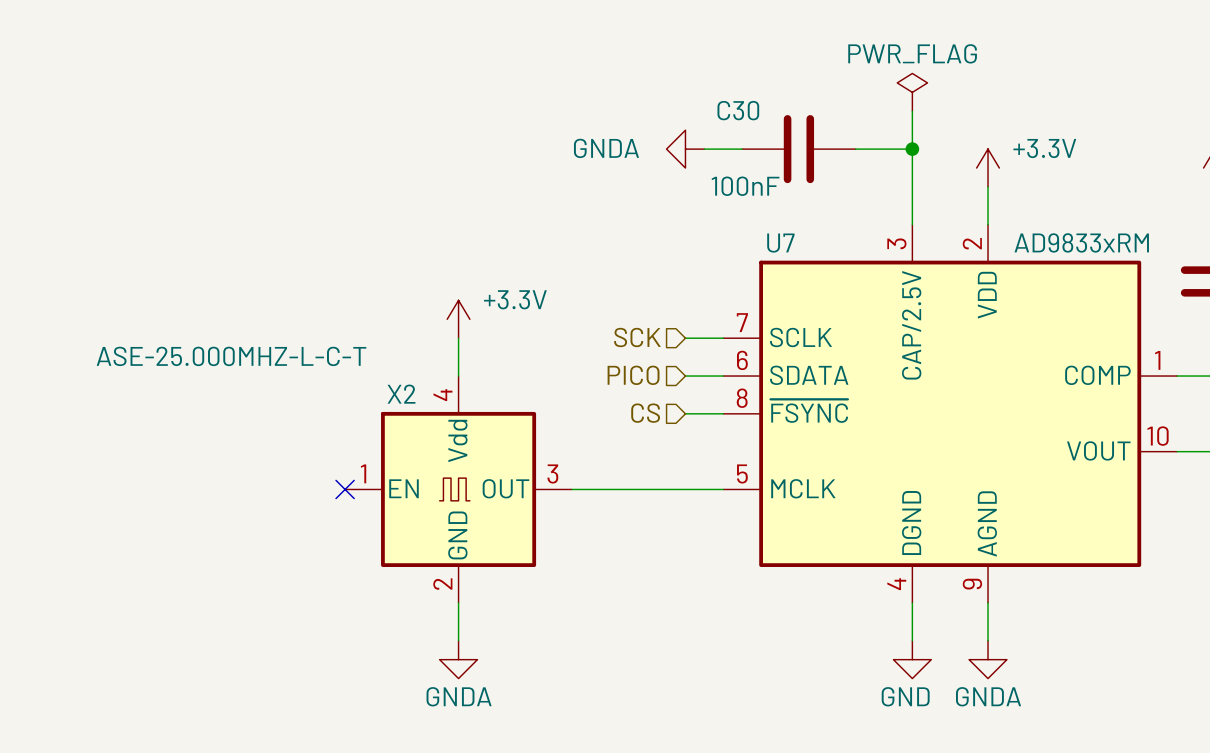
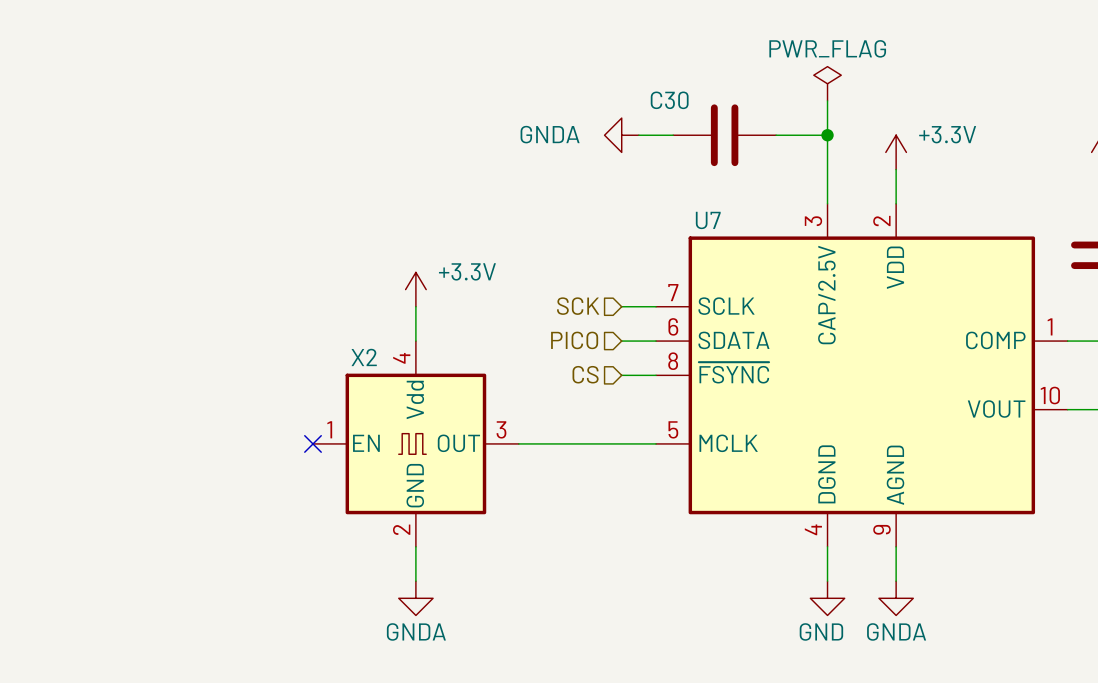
C30 value: 100nF (745, 186) -> none
U7 value: AD9833xRM (1081, 242) -> none
X2 value: ASE-25.000MHZ-L-C-T (231, 356) -> none

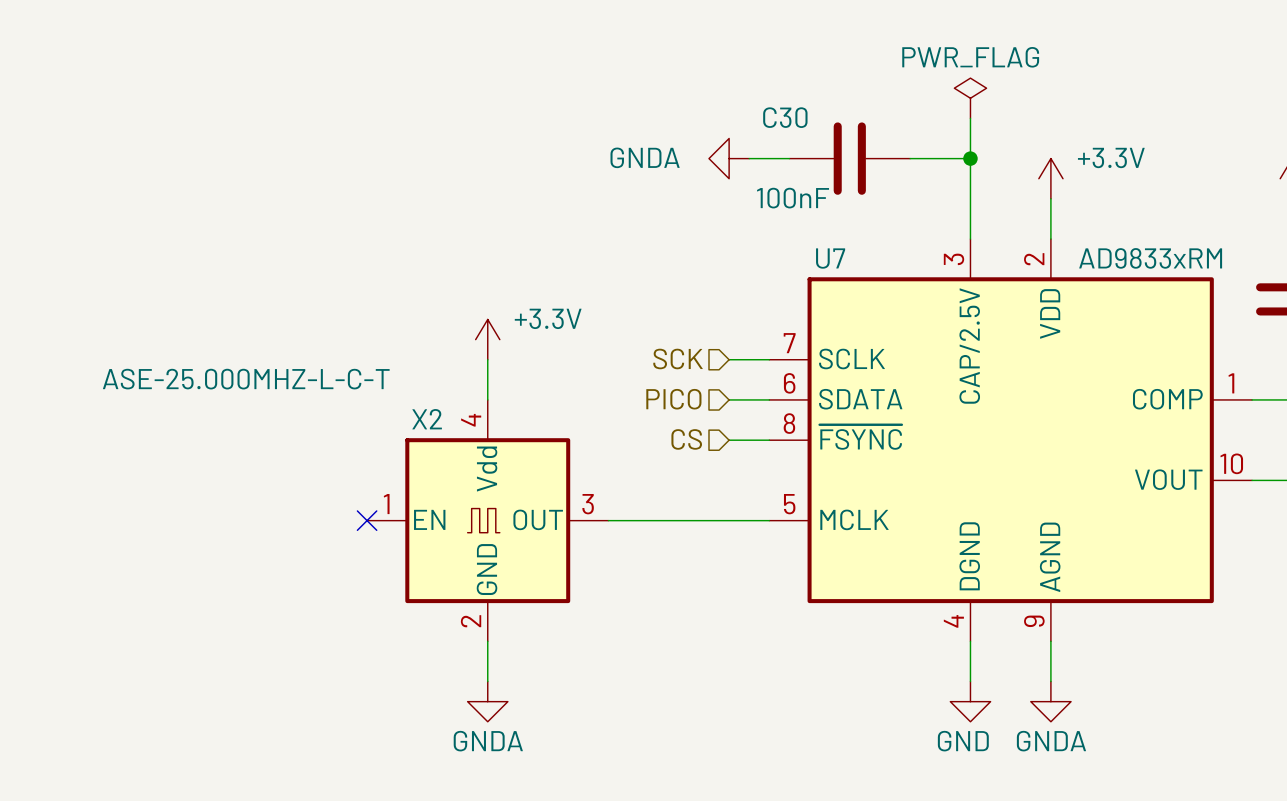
C30 value: none -> 100nF (793, 198)
U7 value: none -> AD9833xRM (1150, 258)
X2 value: none -> ASE-25.000MHZ-L-C-T (246, 379)

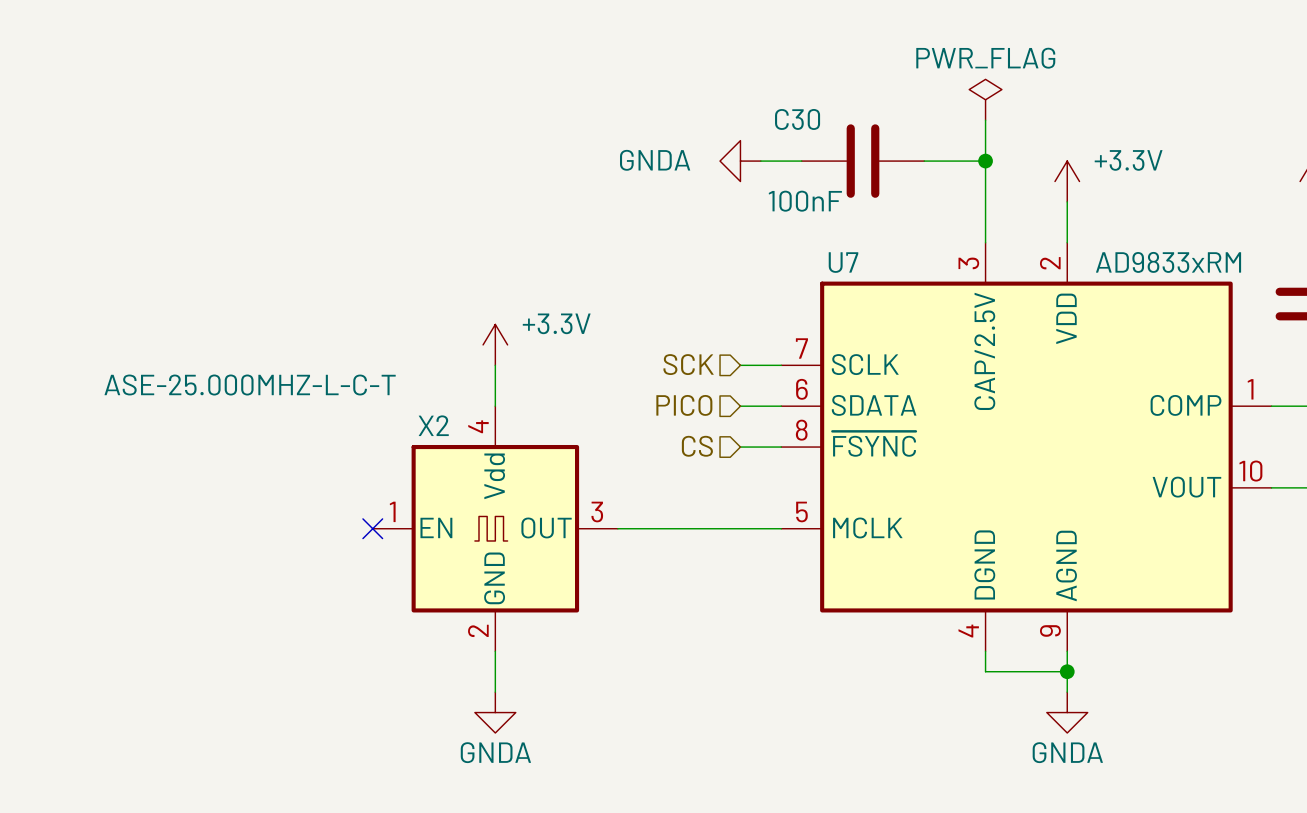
wire: (970, 661) (970, 681) -> (985, 671) (1067, 671)
junction: none -> (1067, 671)
power symbol: GND (970, 701) -> none

